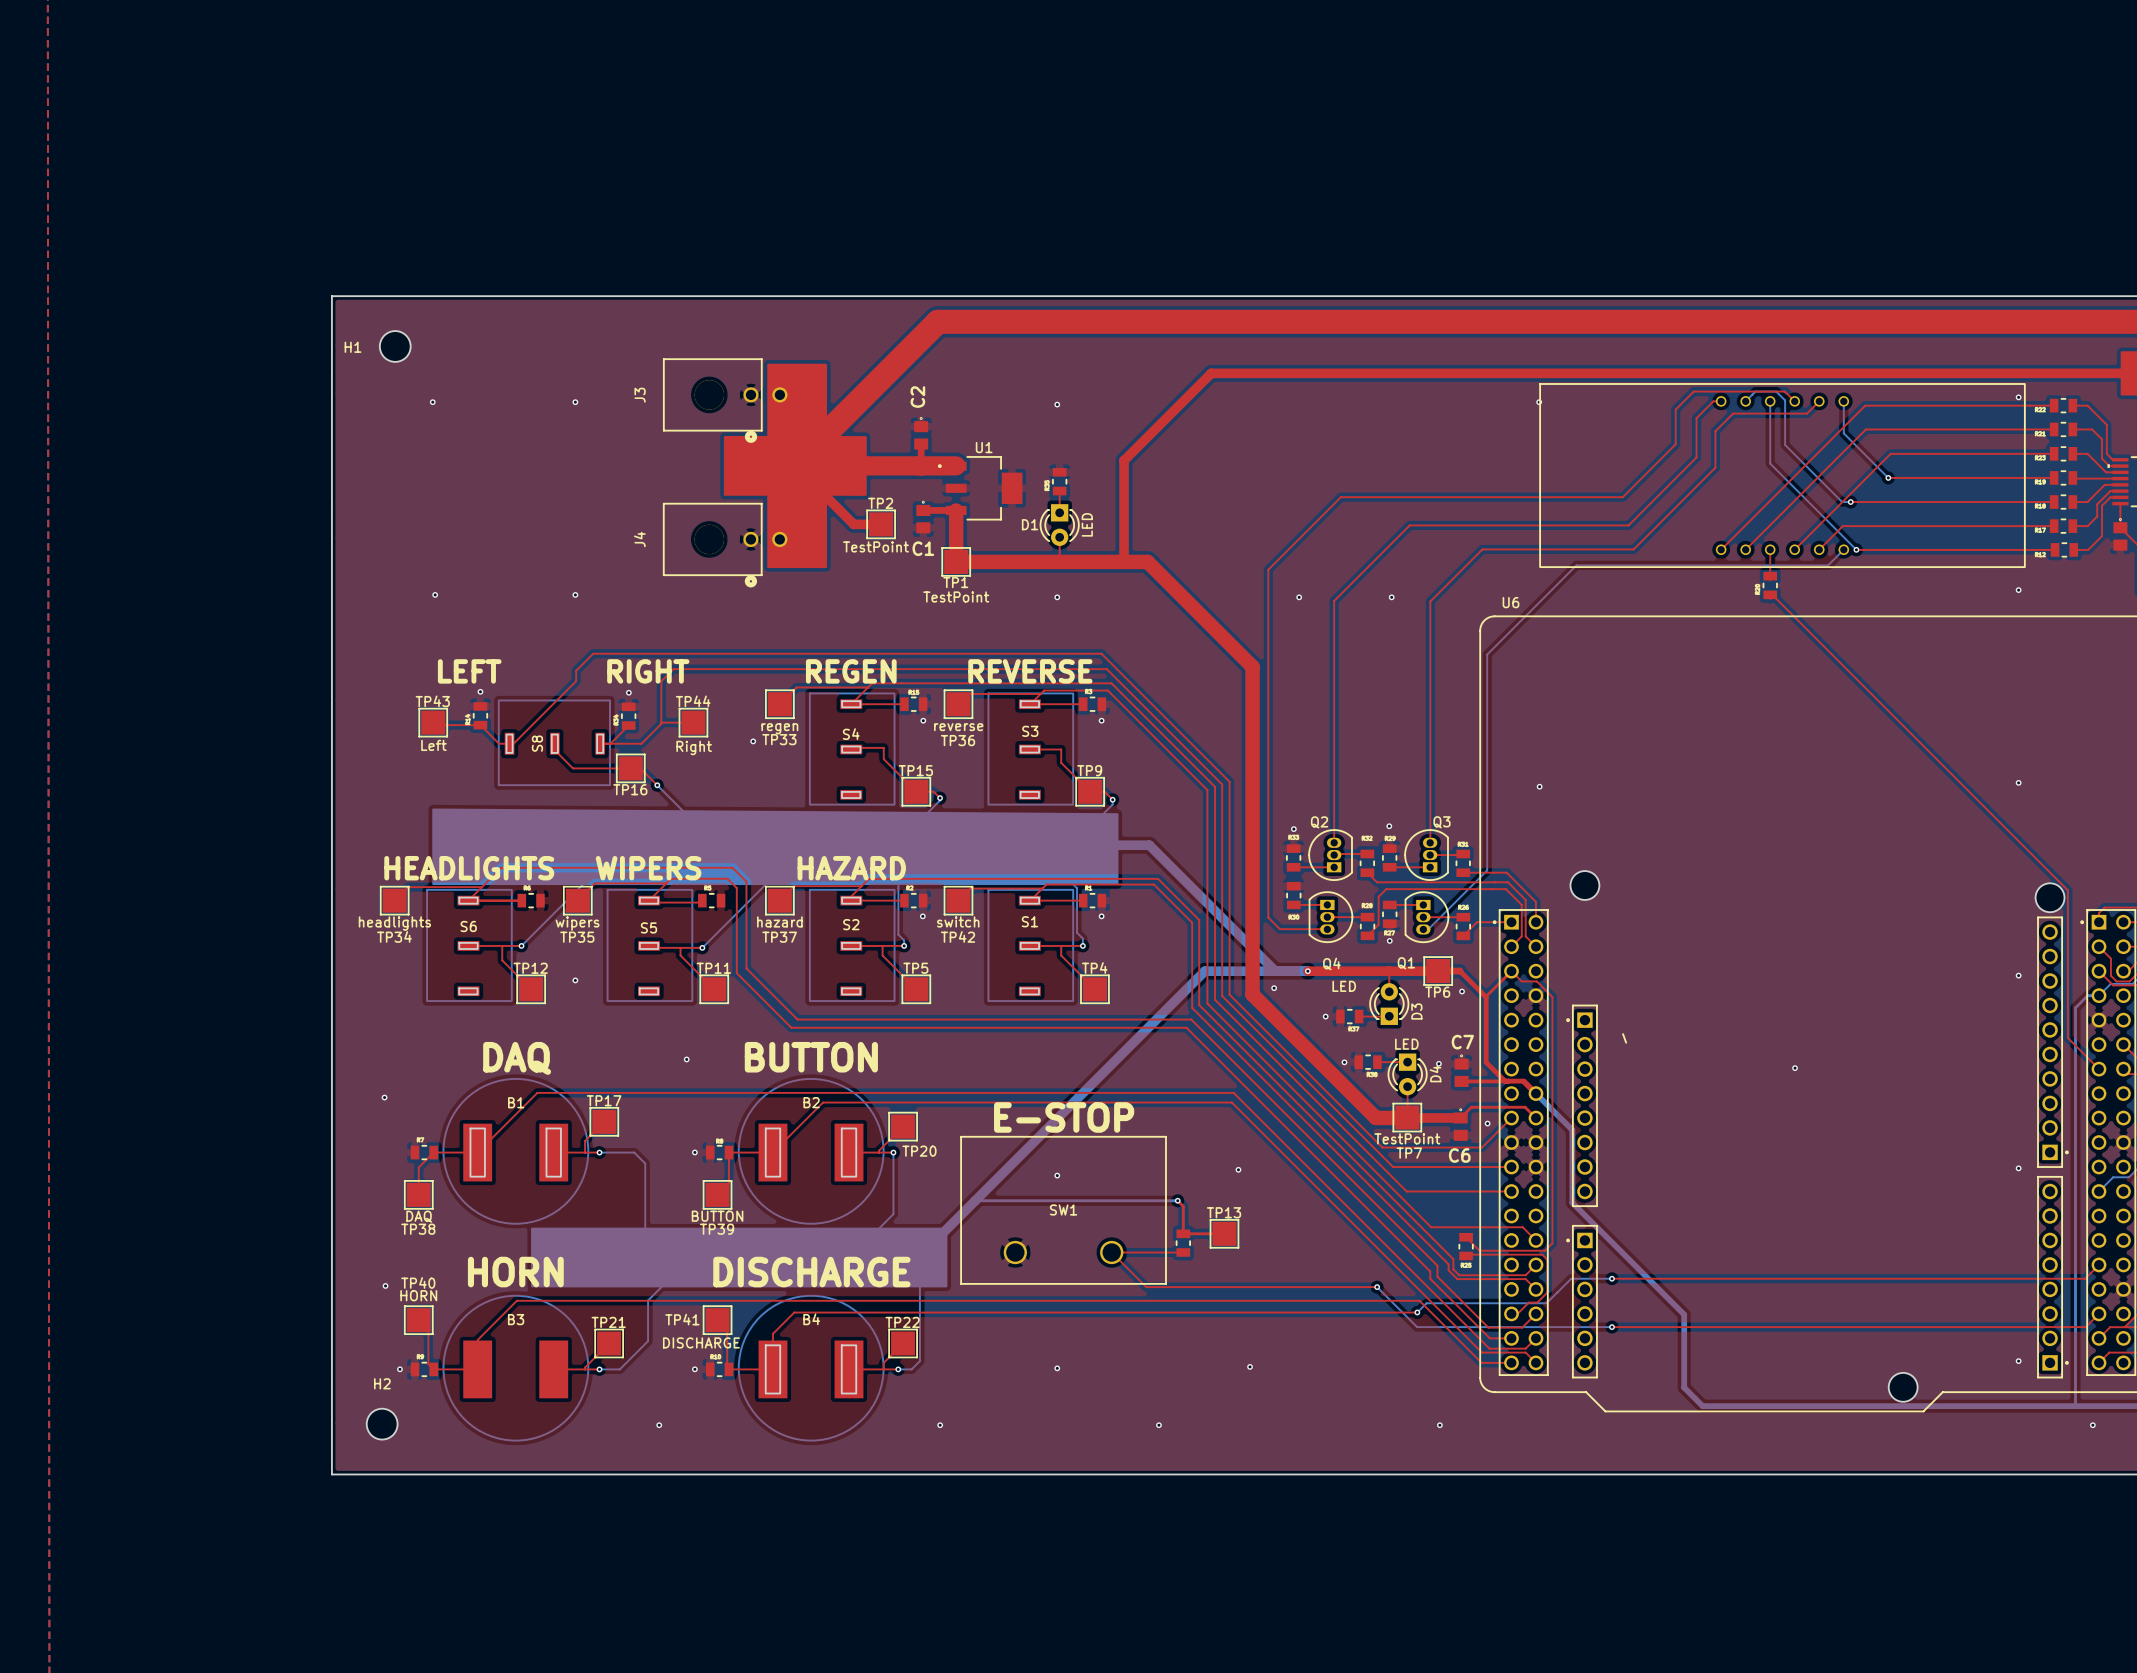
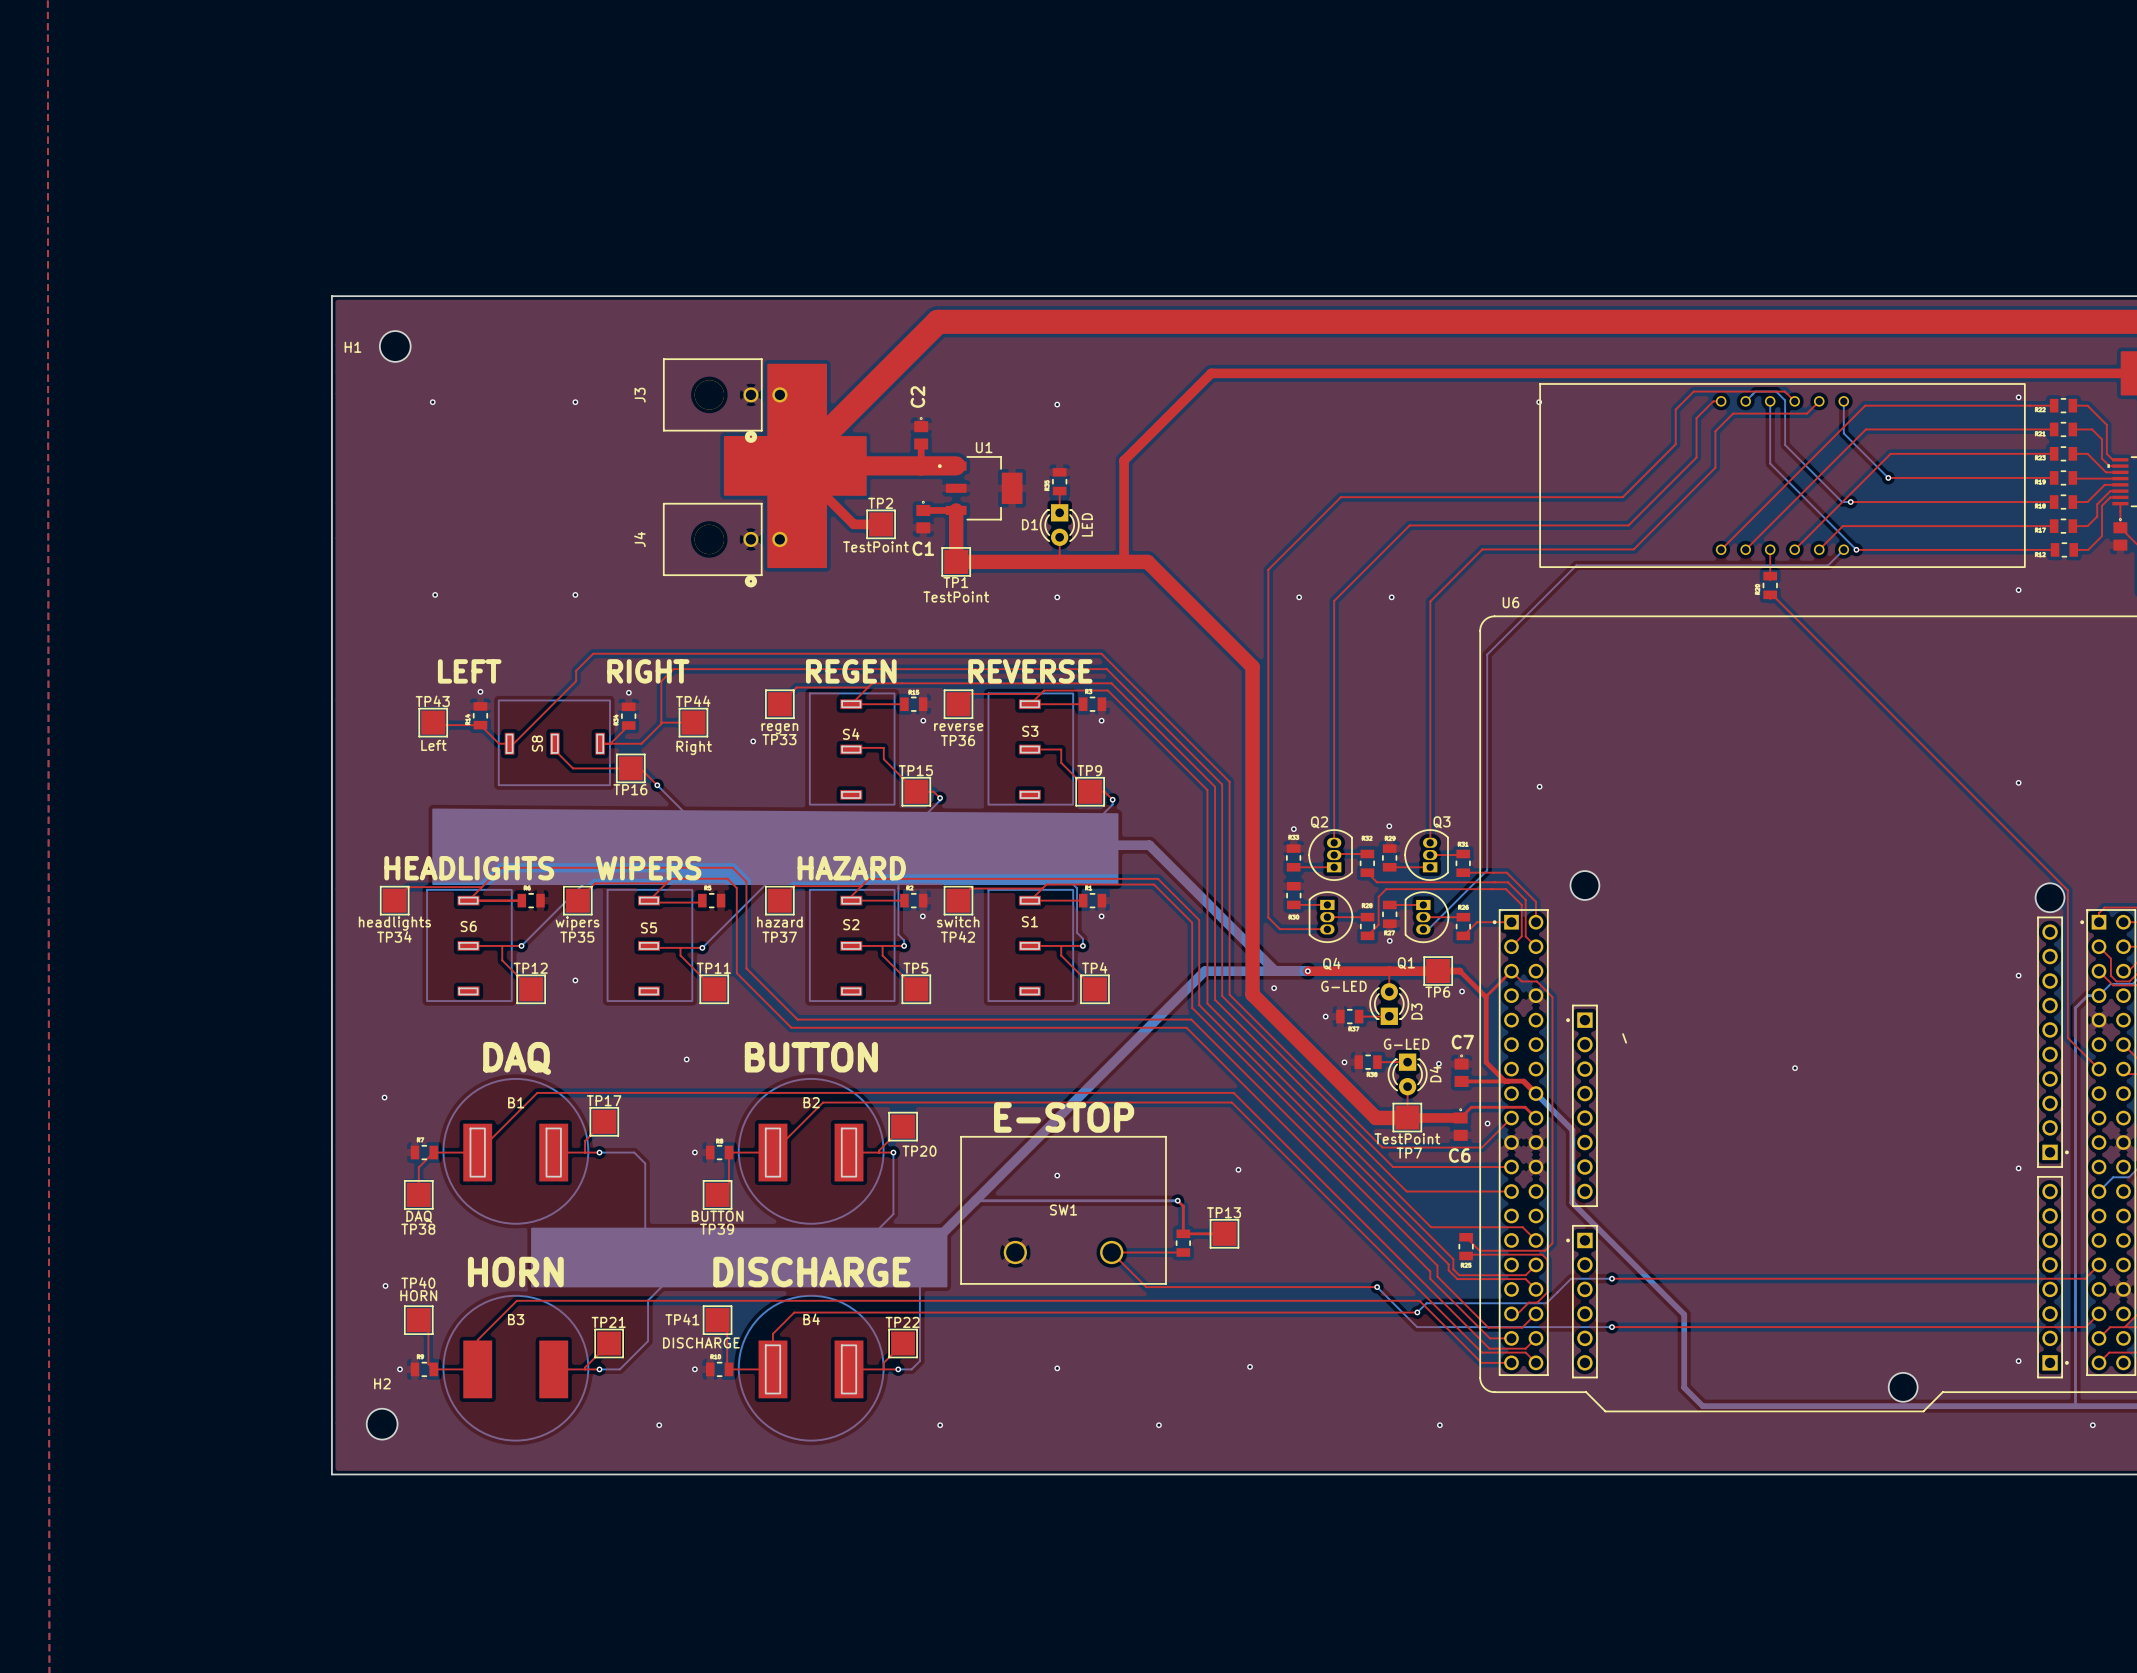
D3 value: LED (1344, 986) -> G-LED (1343, 986)
D4 value: LED (1406, 1044) -> G-LED (1406, 1044)

